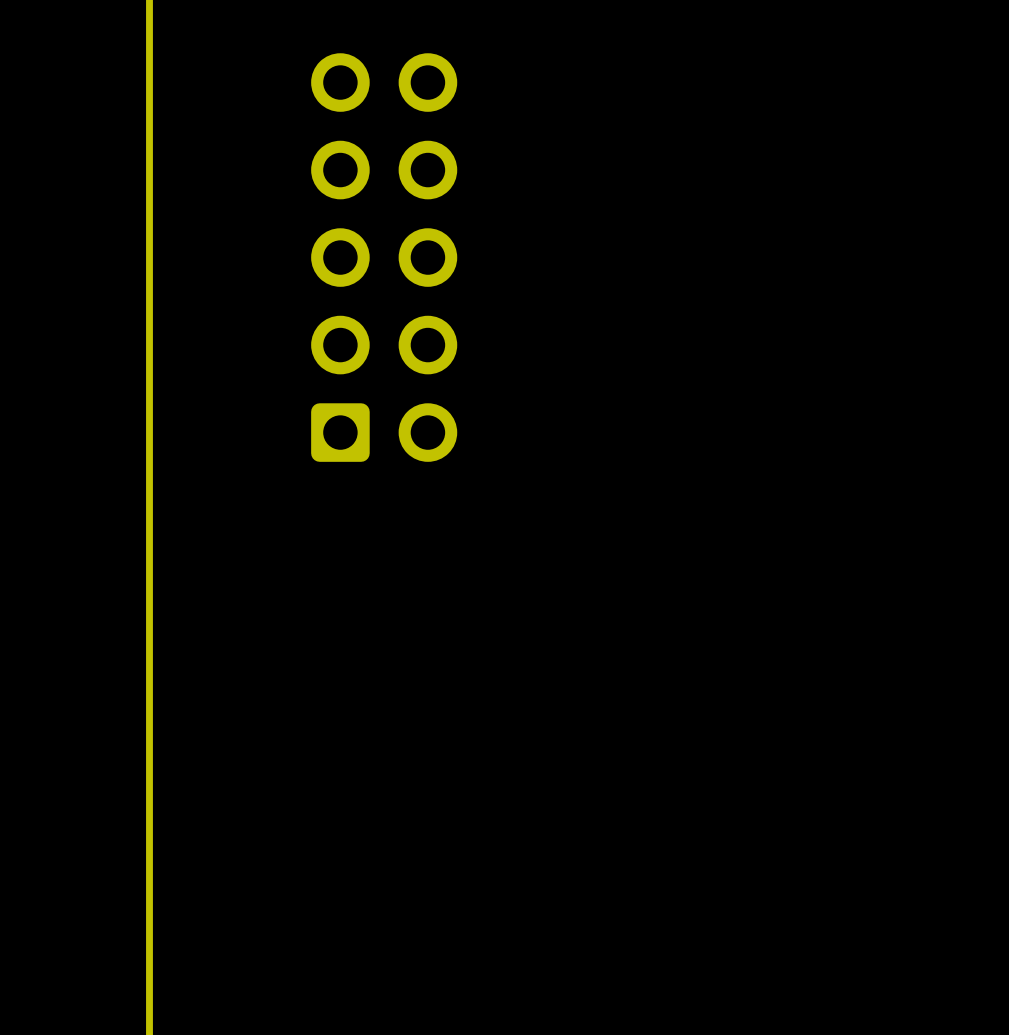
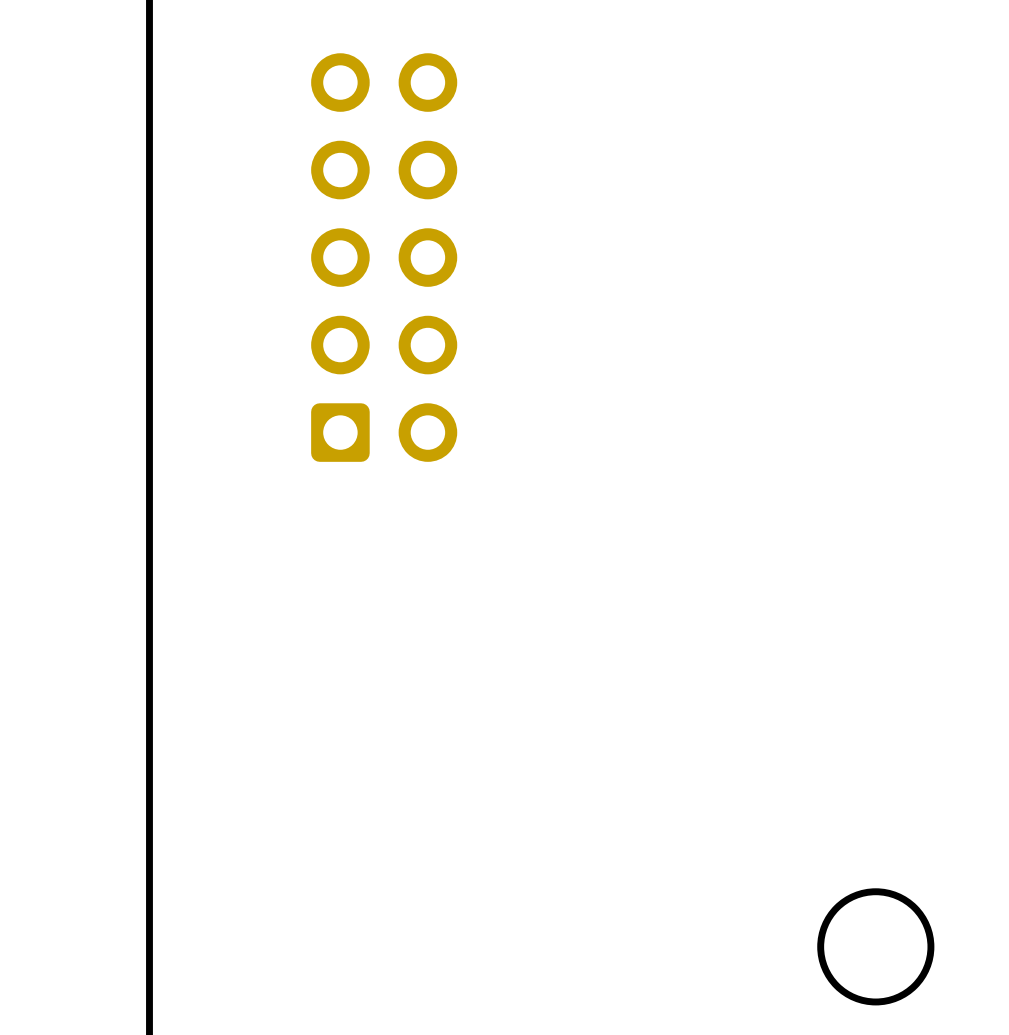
round board edge: none -> [817, 888, 935, 1006]

